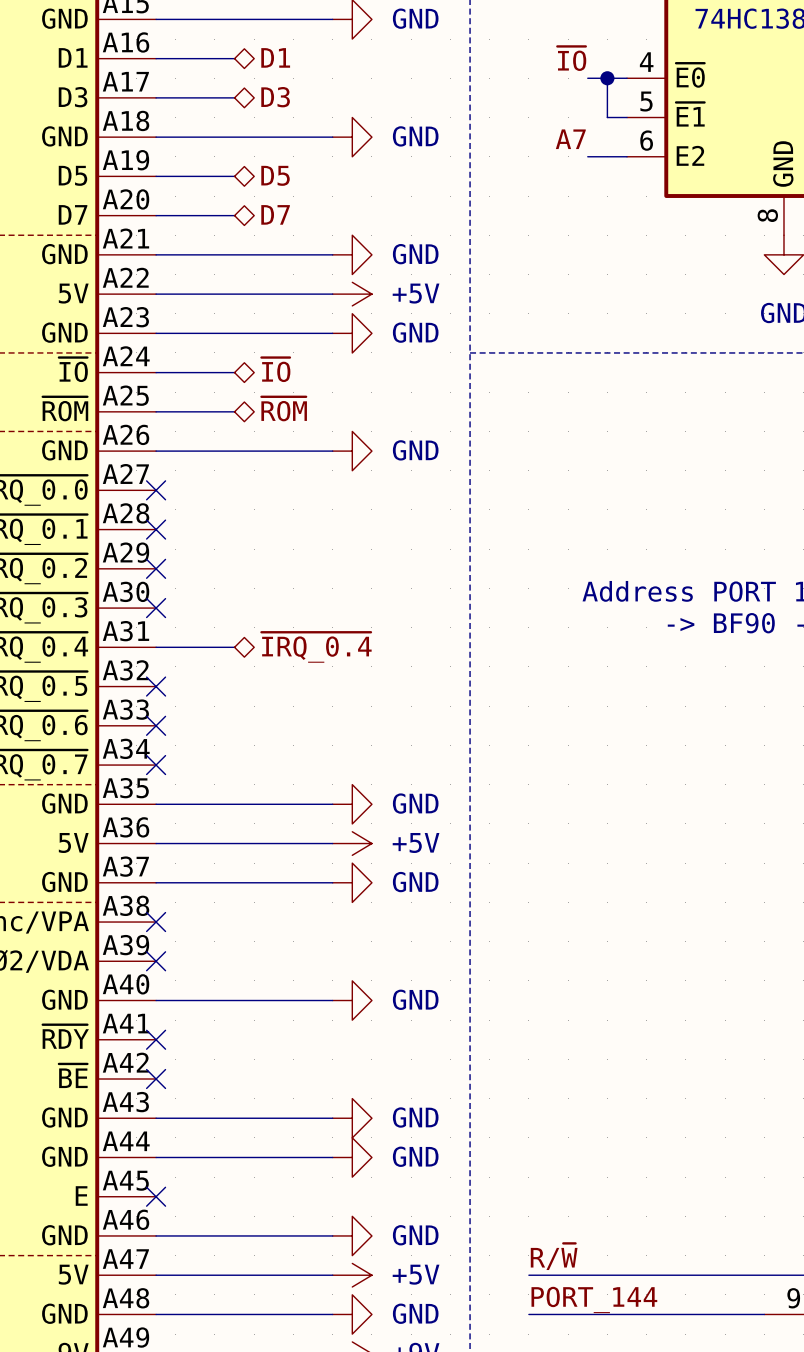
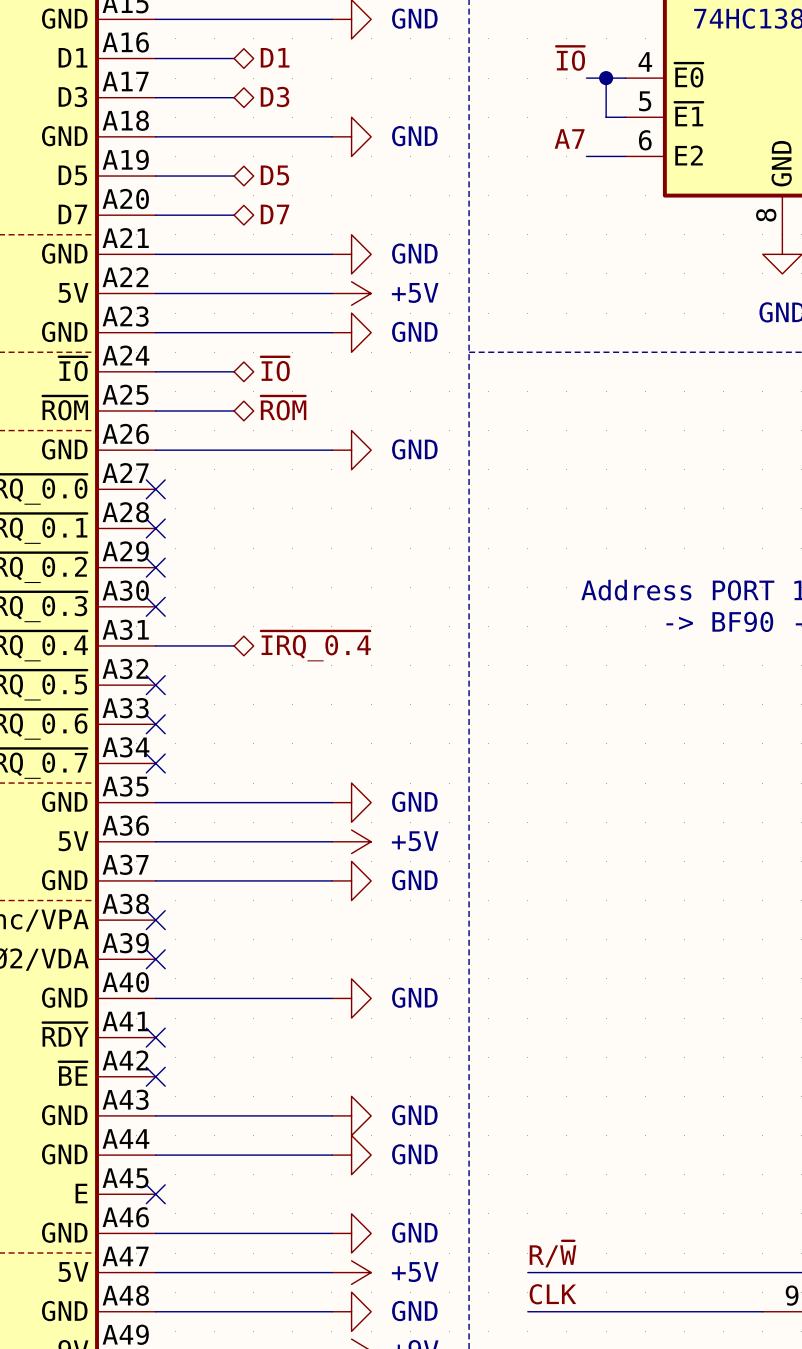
label: PORT_144 (594, 1299) -> CLK (552, 1294)

